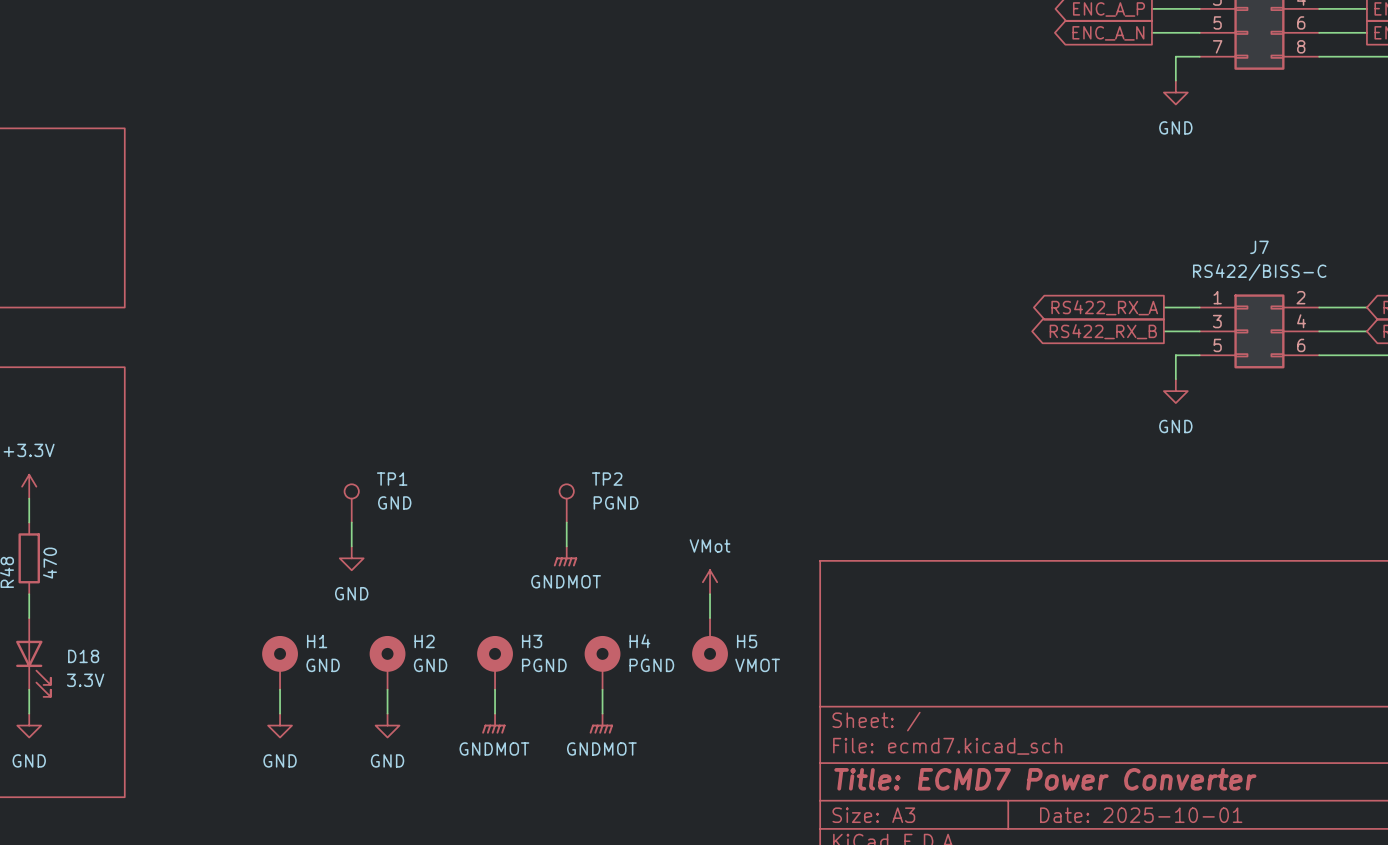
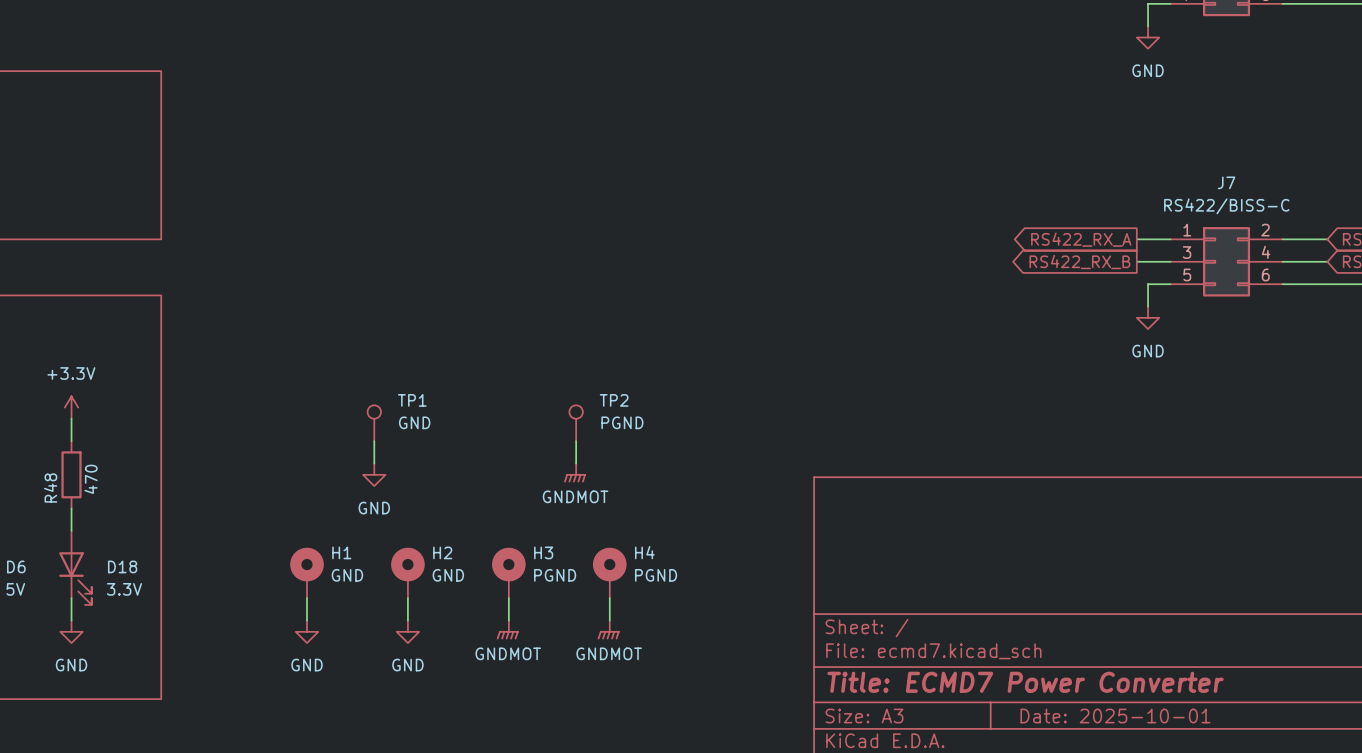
power symbol: VMot (710, 582) -> none
wire: (710, 594) (710, 618) -> none
H5: VMOT (710, 644) -> none

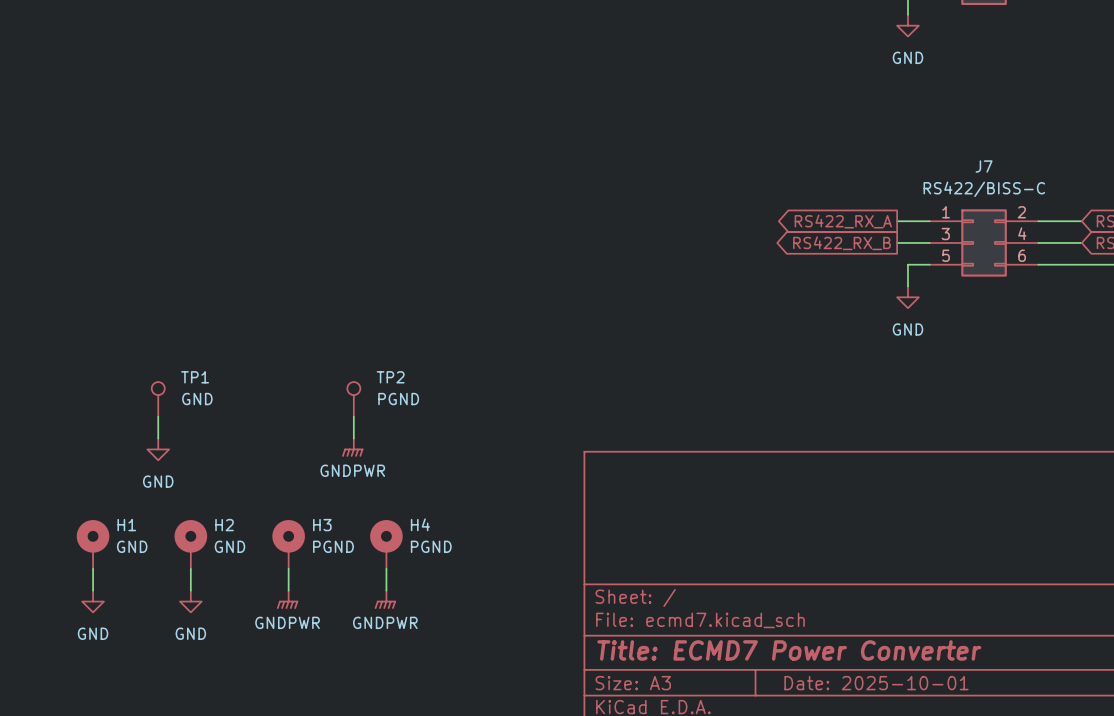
power symbol: GNDMOT (575, 473) -> GNDPWR (352, 447)
power symbol: GNDMOT (507, 630) -> GNDPWR (287, 599)
power symbol: GNDMOT (608, 630) -> GNDPWR (385, 599)

